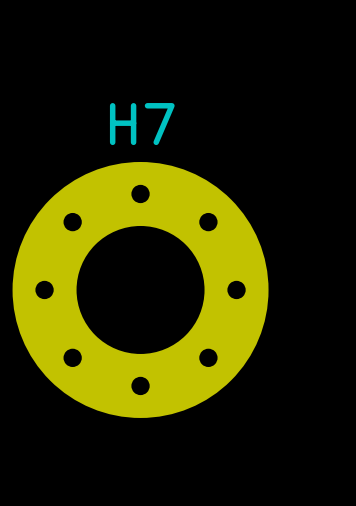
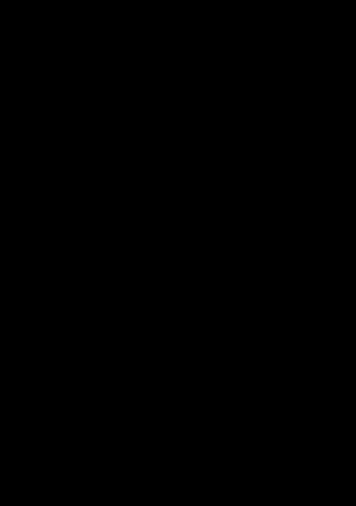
H7: (140, 289) -> none

